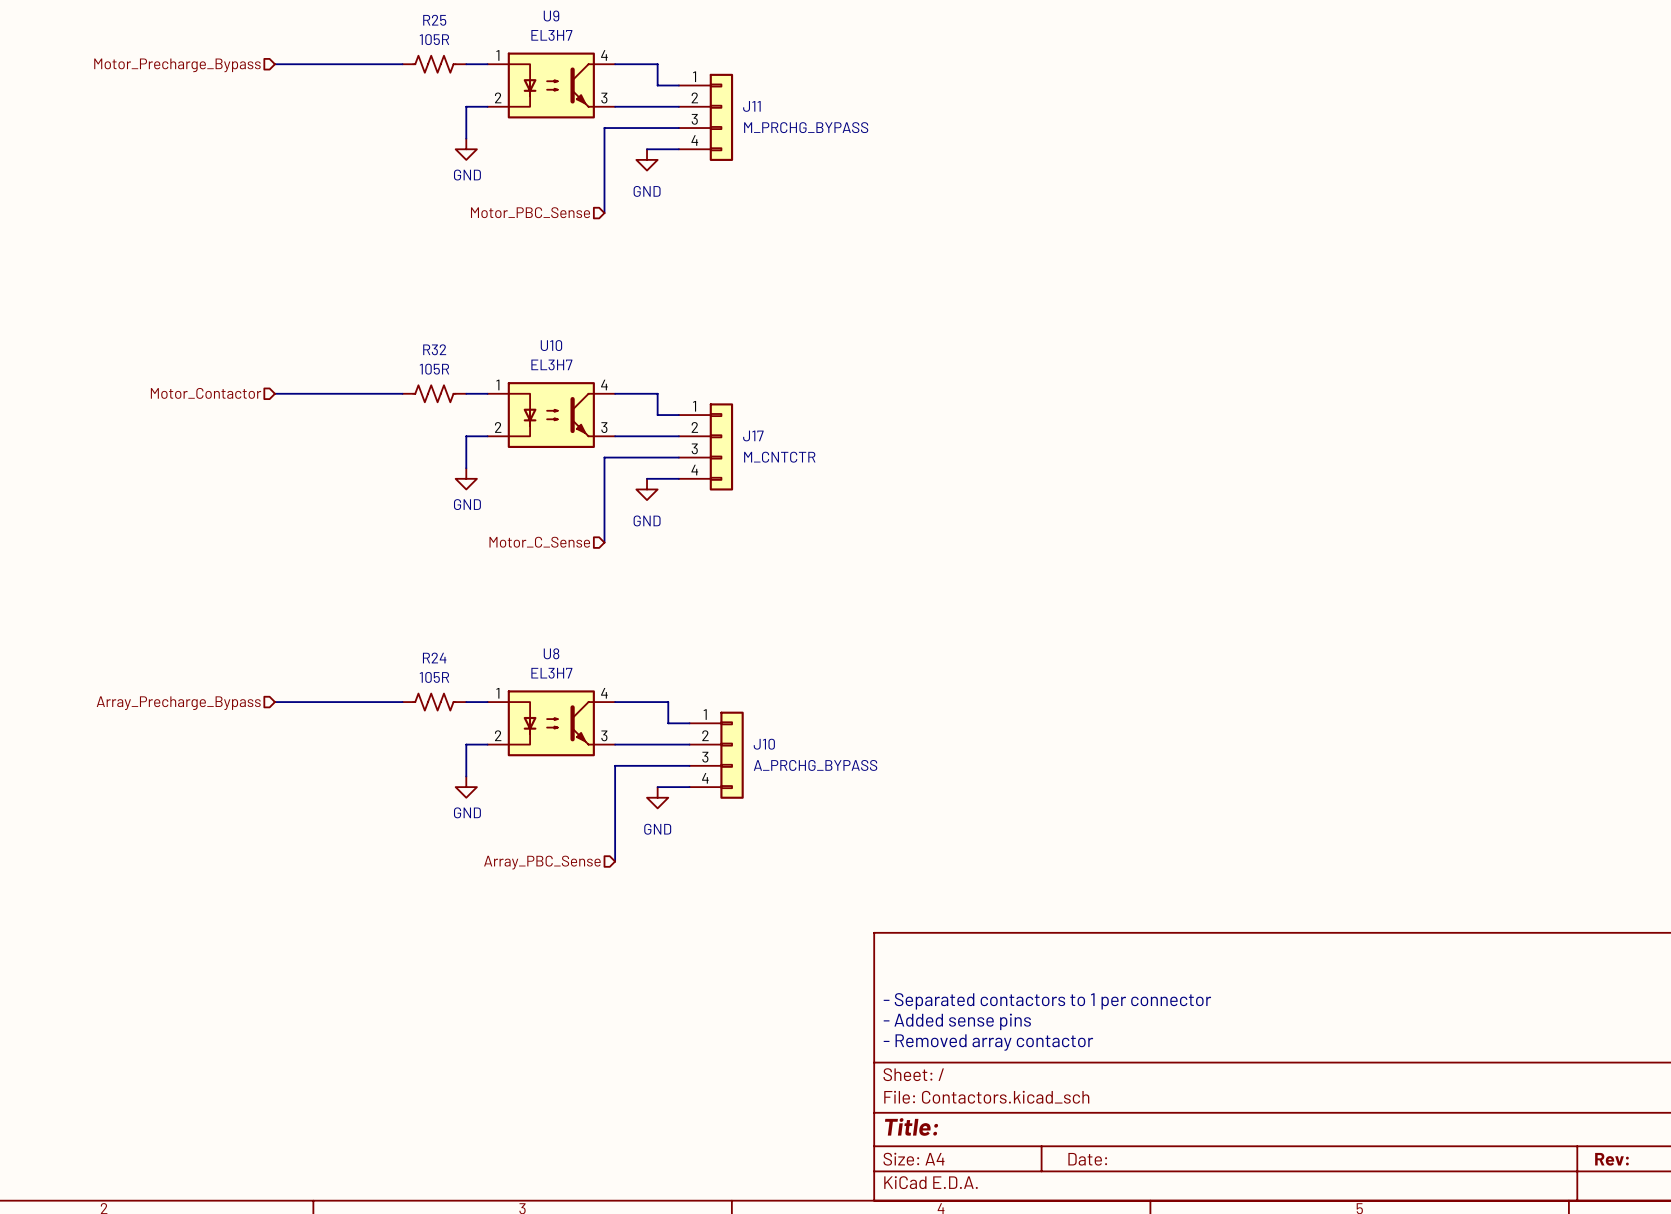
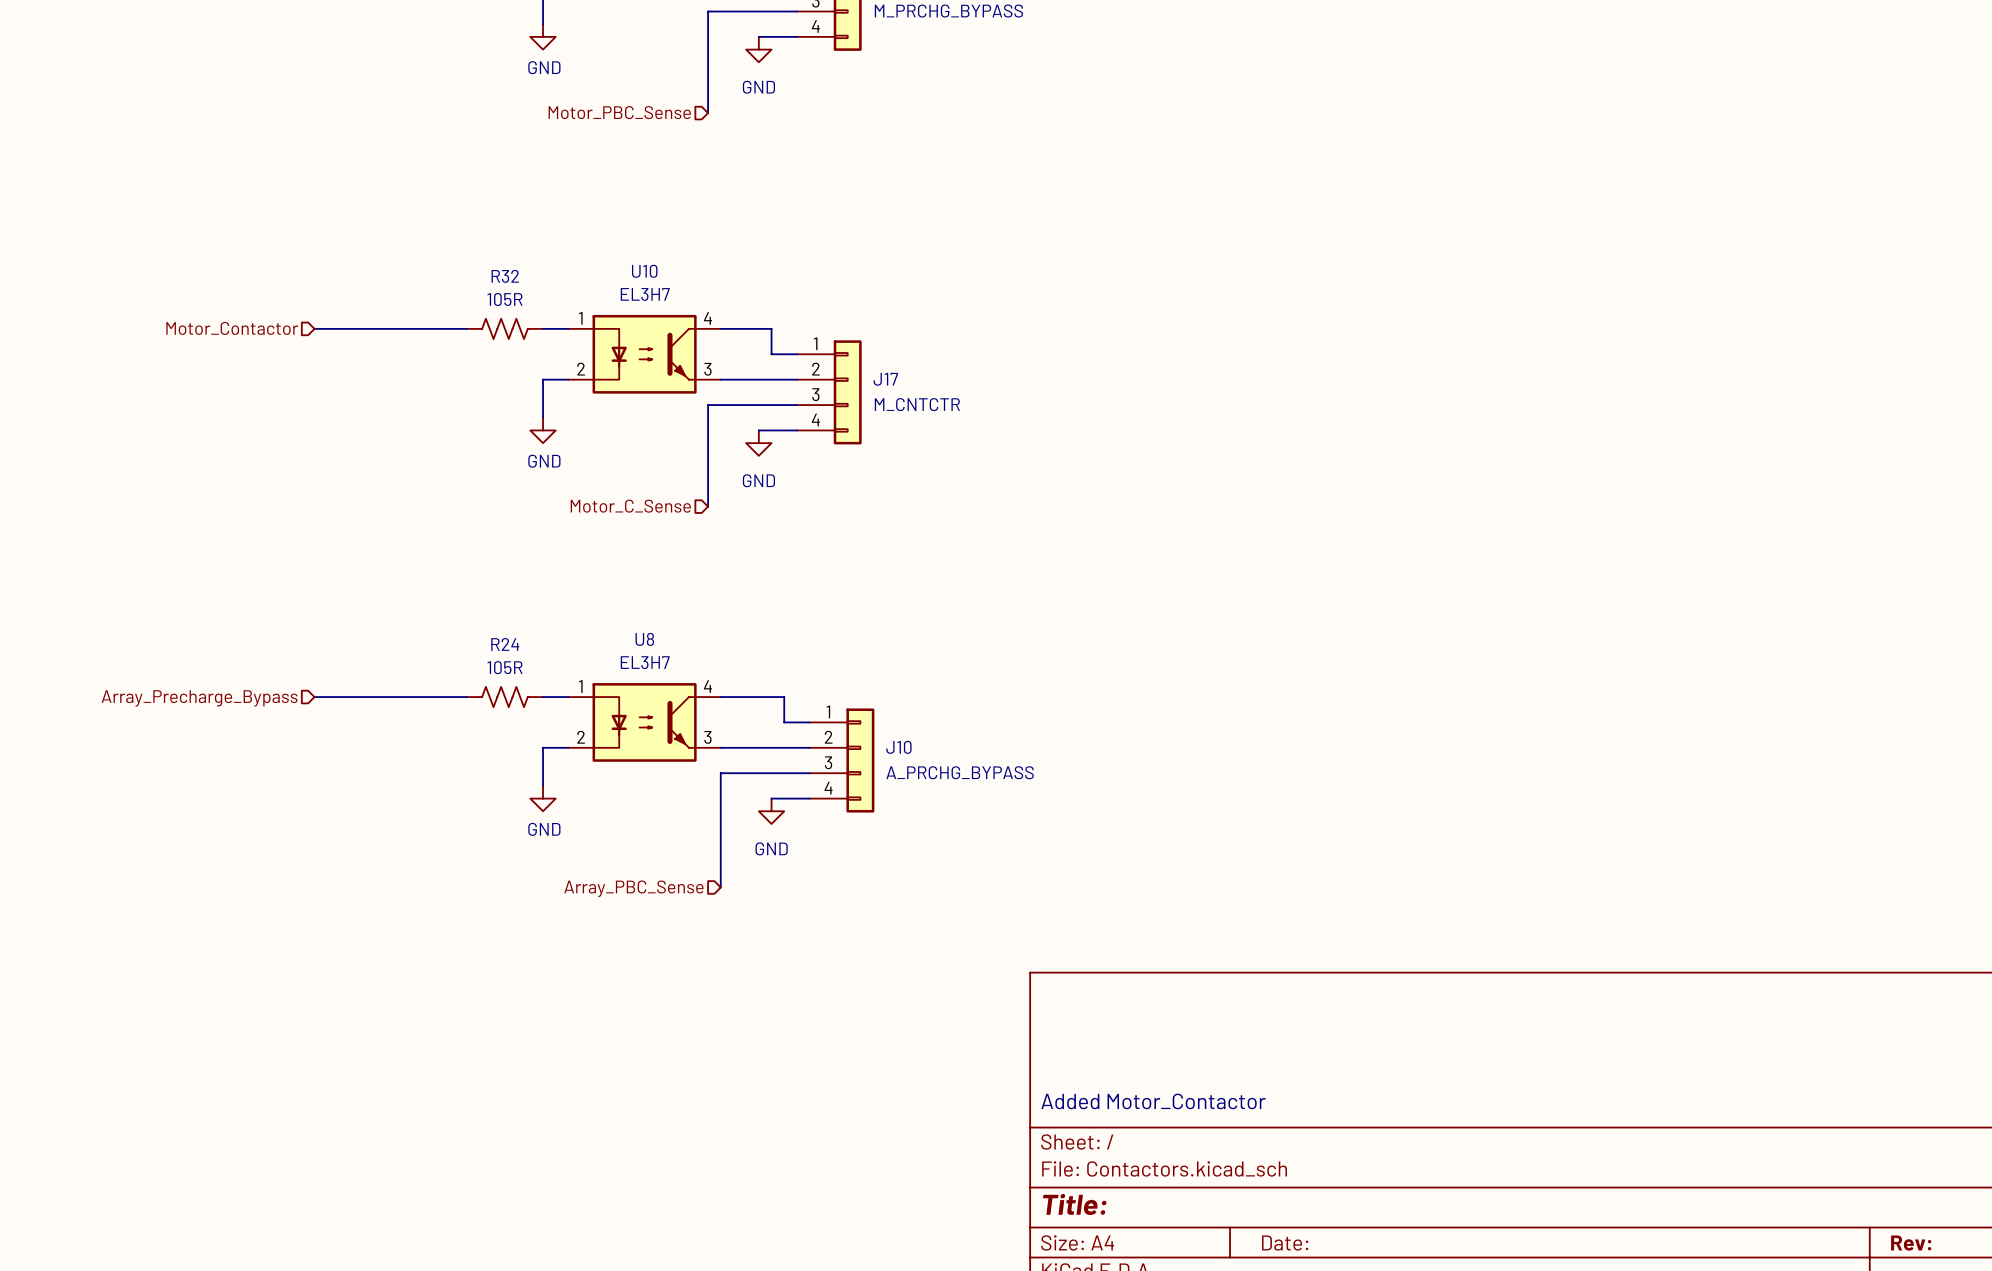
text: - Separated contactors to 1 per connector (1047, 1001) -> none
text: - Added sense pins (957, 1021) -> none
text: - Removed array contactor (988, 1042) -> Added Motor_Contactor (1153, 1101)

